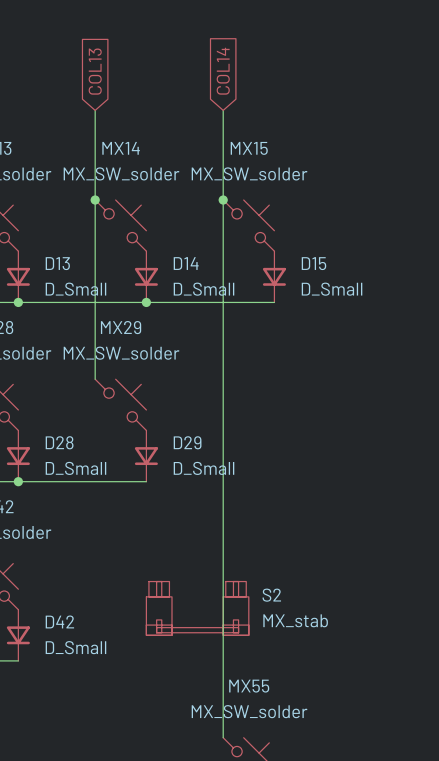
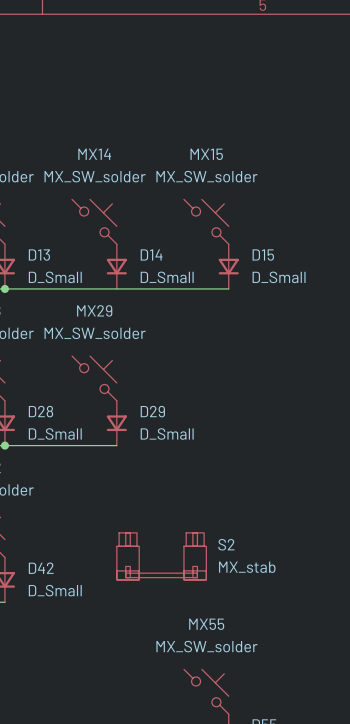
global label: COL13 (95, 71) -> none
global label: COL14 (223, 71) -> none
wire: (95, 110) (95, 379) -> none
wire: (223, 110) (223, 737) -> none
junction: (95, 200) -> none
junction: (223, 200) -> none
junction: (146, 302) -> none

